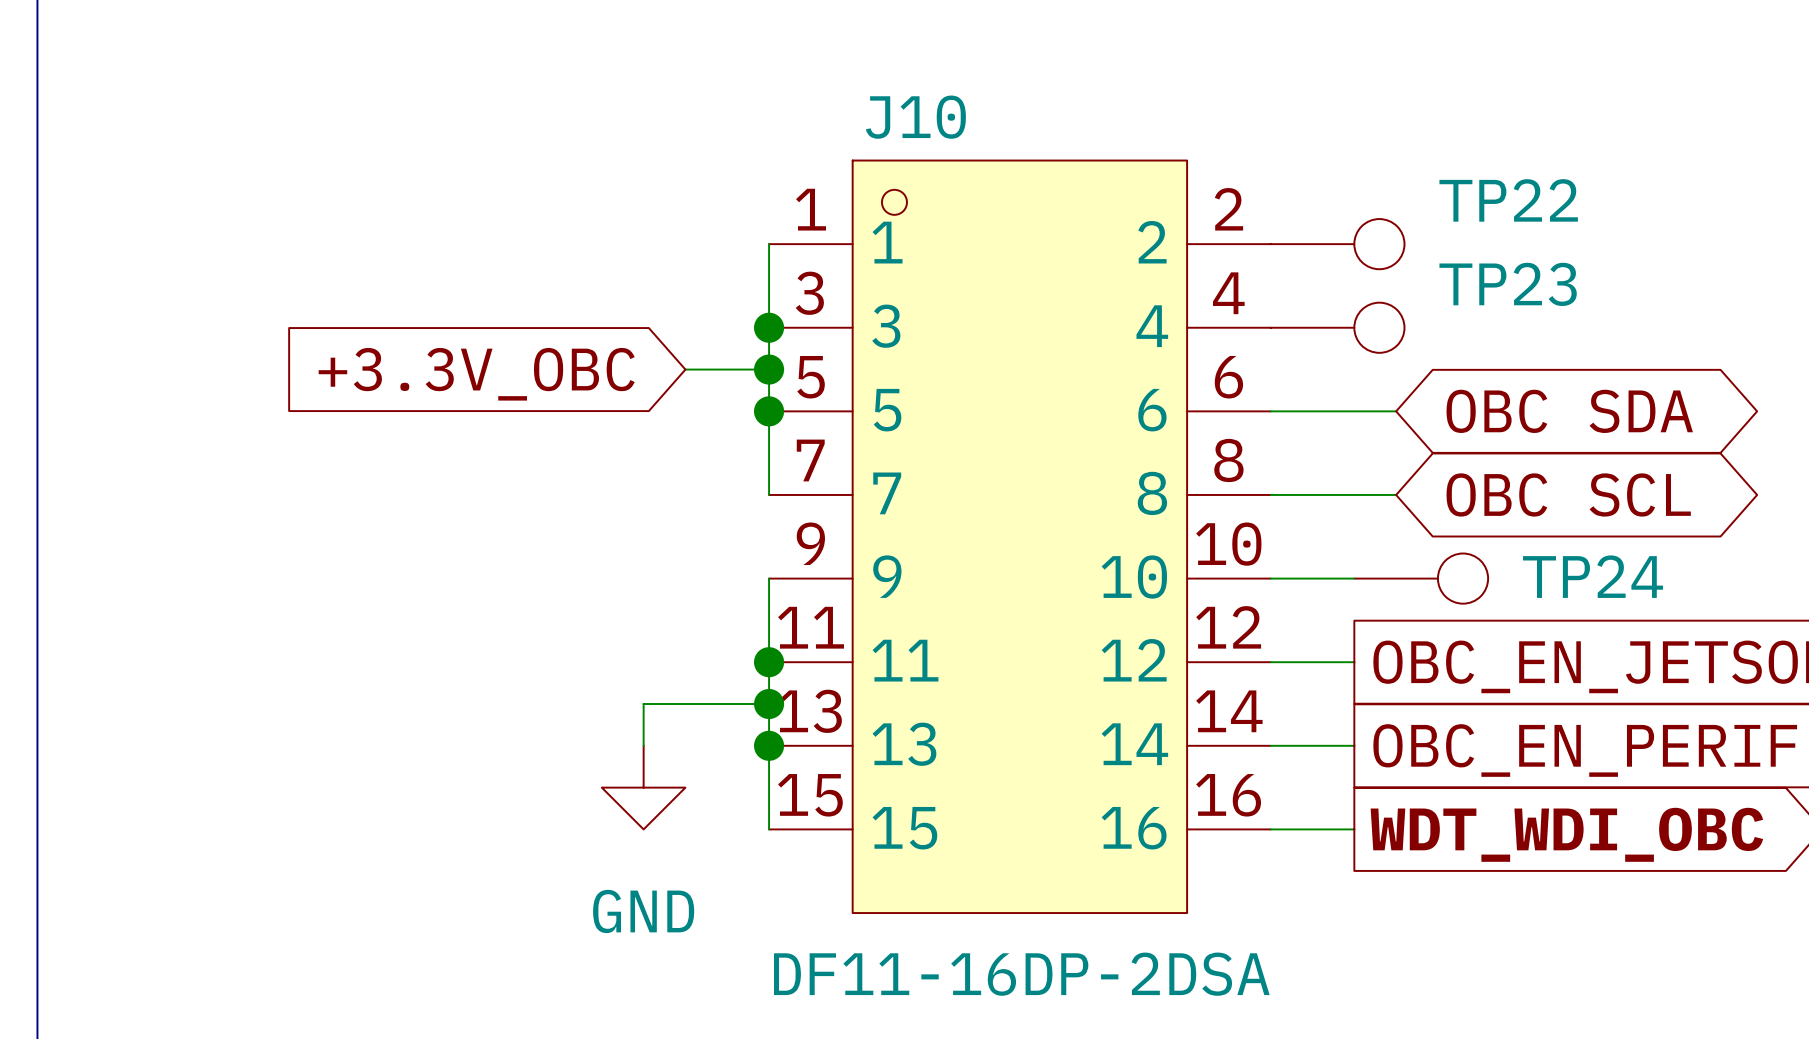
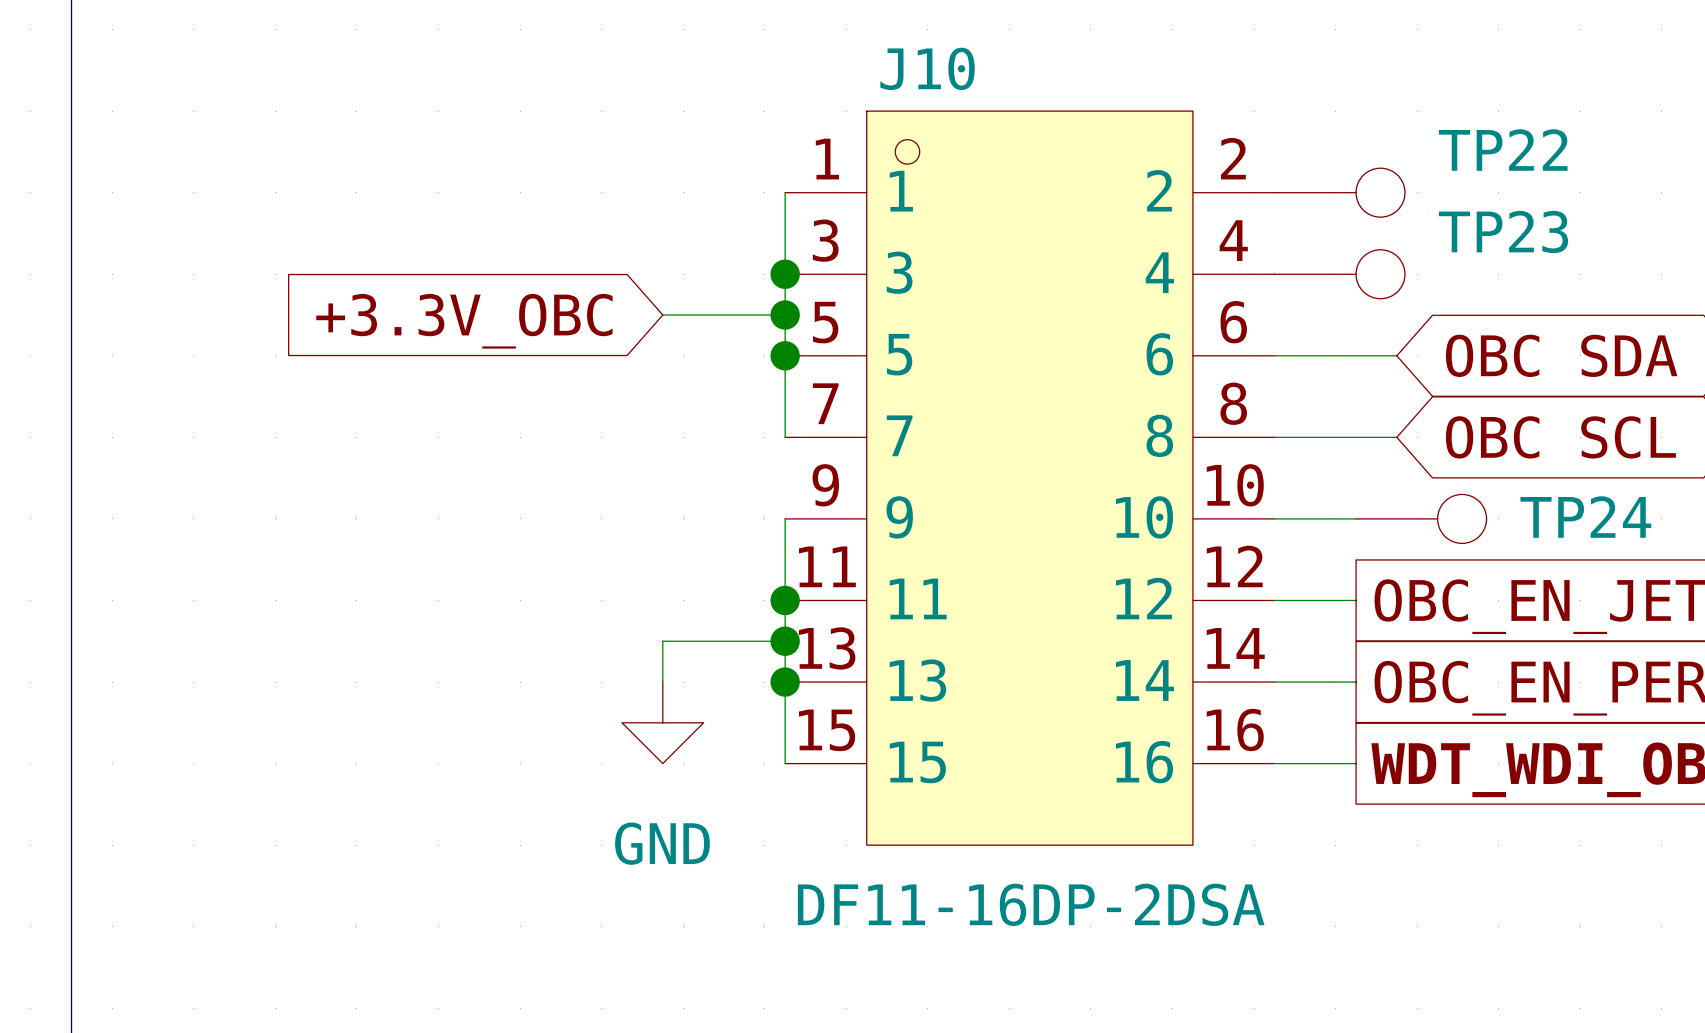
wire: none -> (662, 315) (703, 315)
global label position: +3.3V_OBC (476, 374) -> +3.3V_OBC (464, 321)

